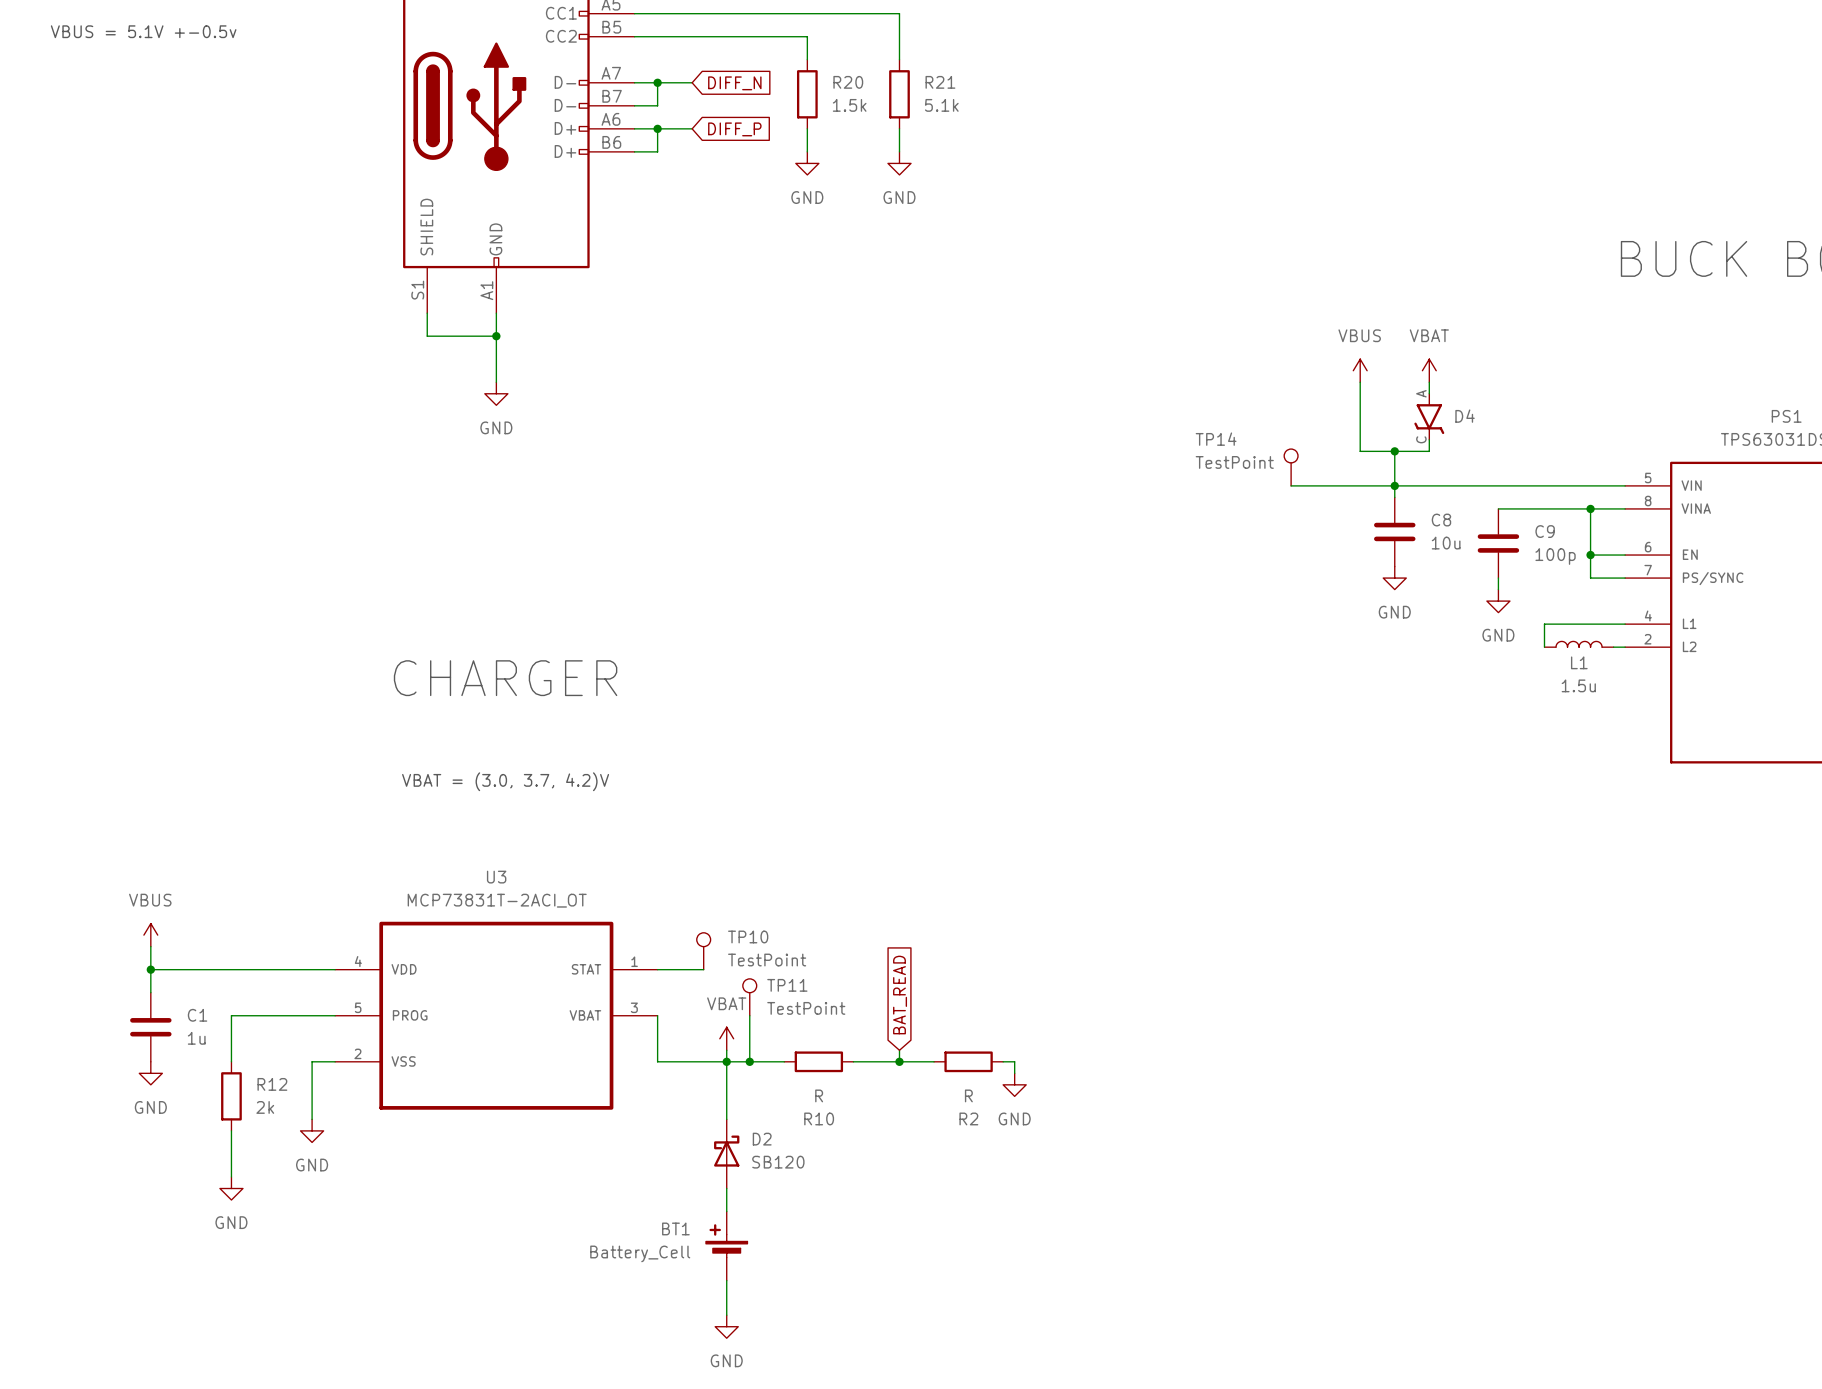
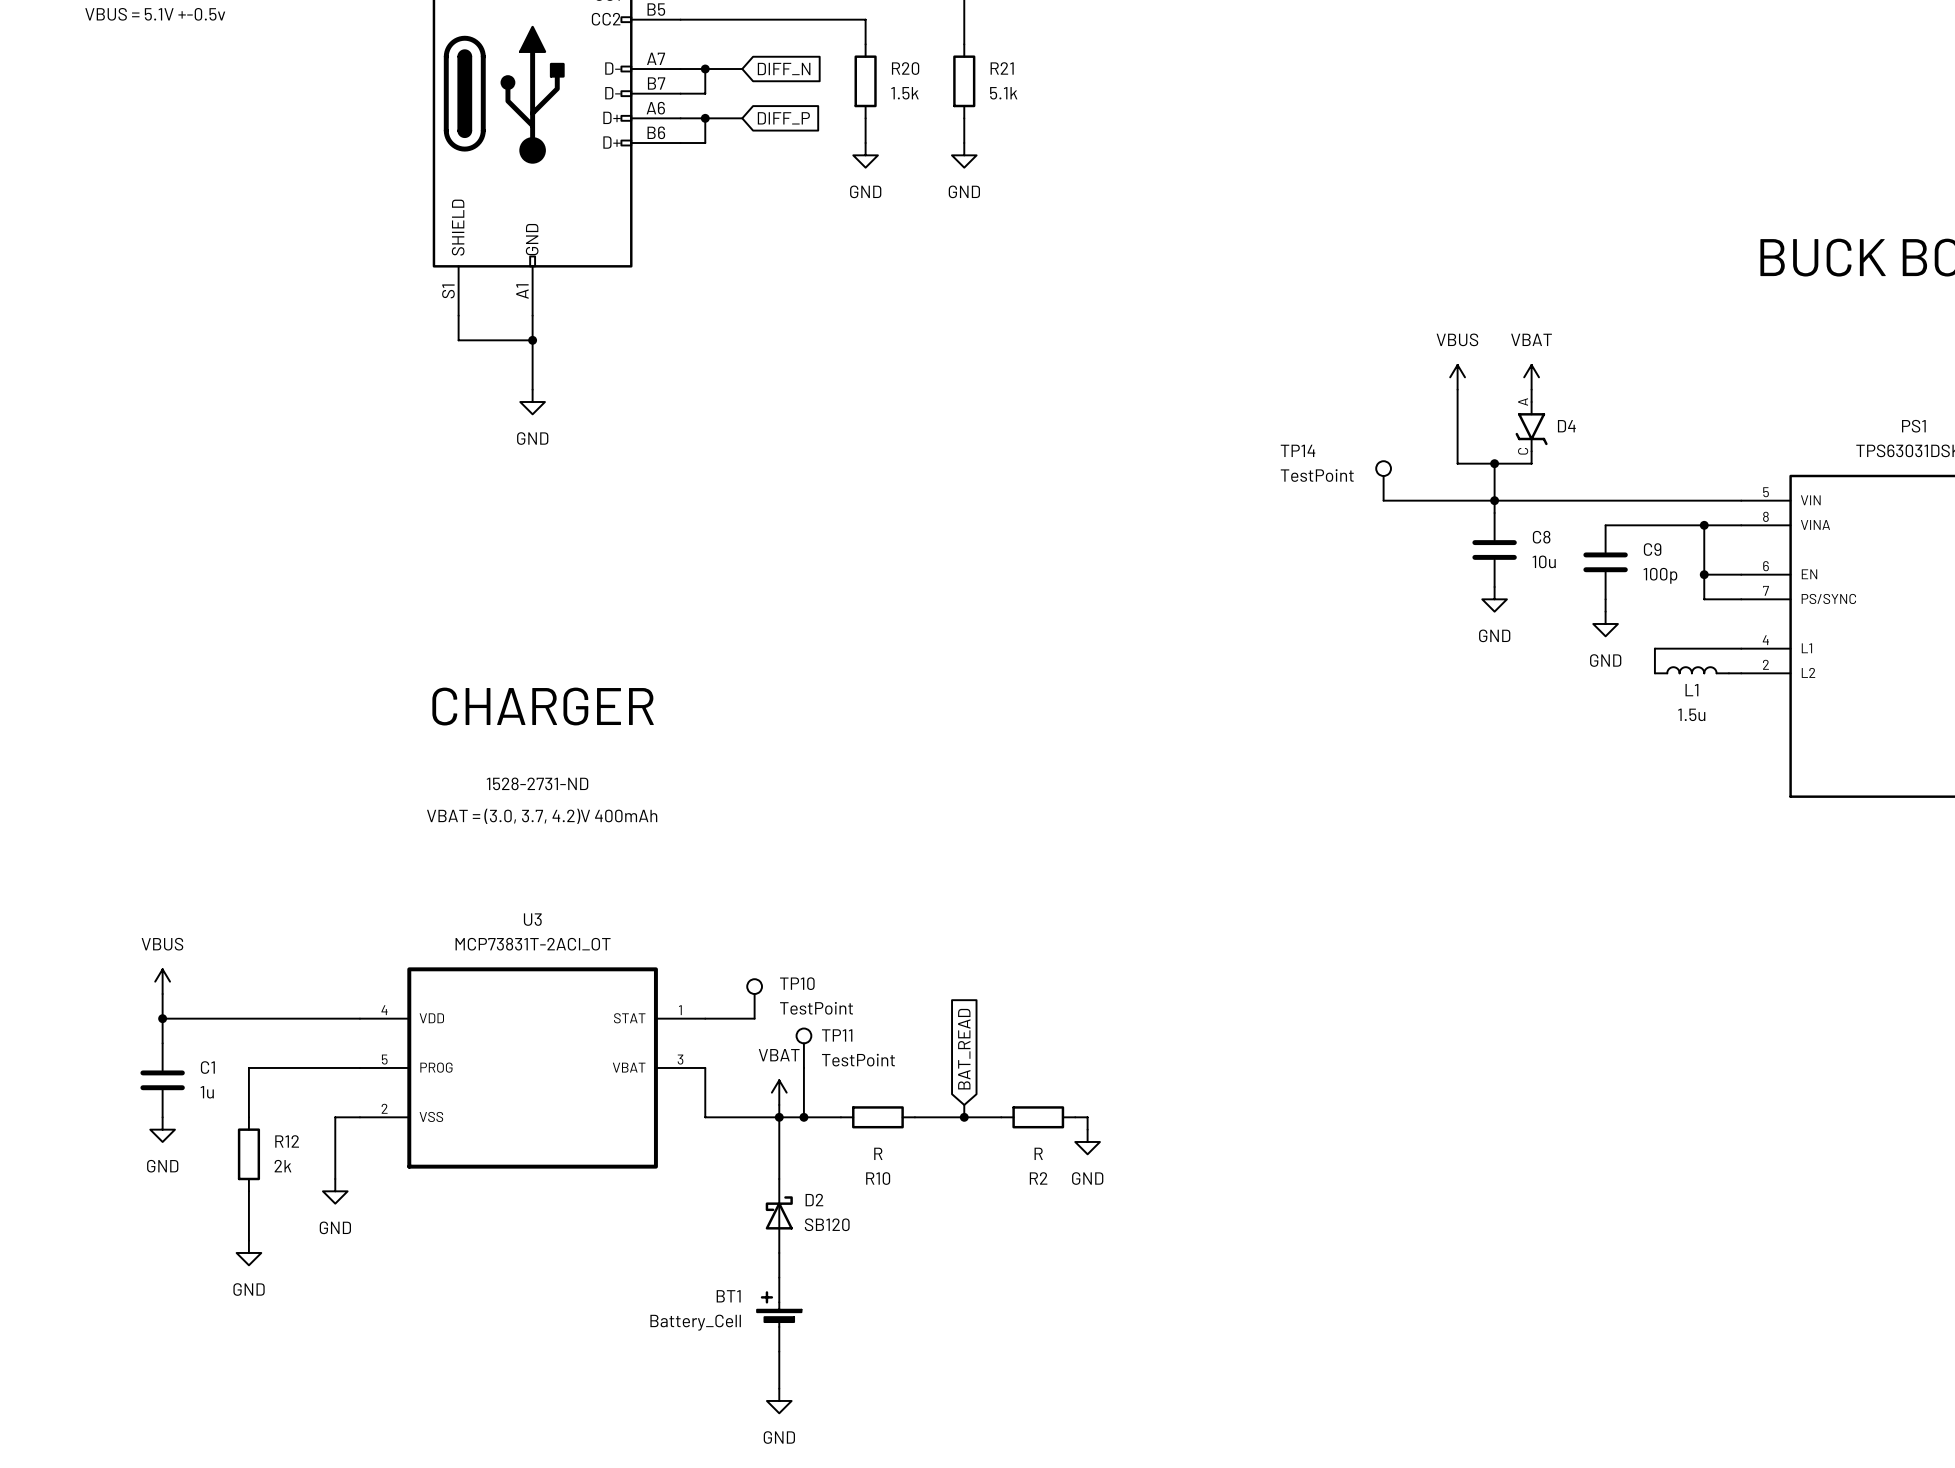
text: none -> 1528-2731-ND (537, 783)
text: VBAT = (3.0, 3.7, 4.2)V (505, 781) -> VBAT = (3.0, 3.7, 4.2)V 400mAh (542, 816)

